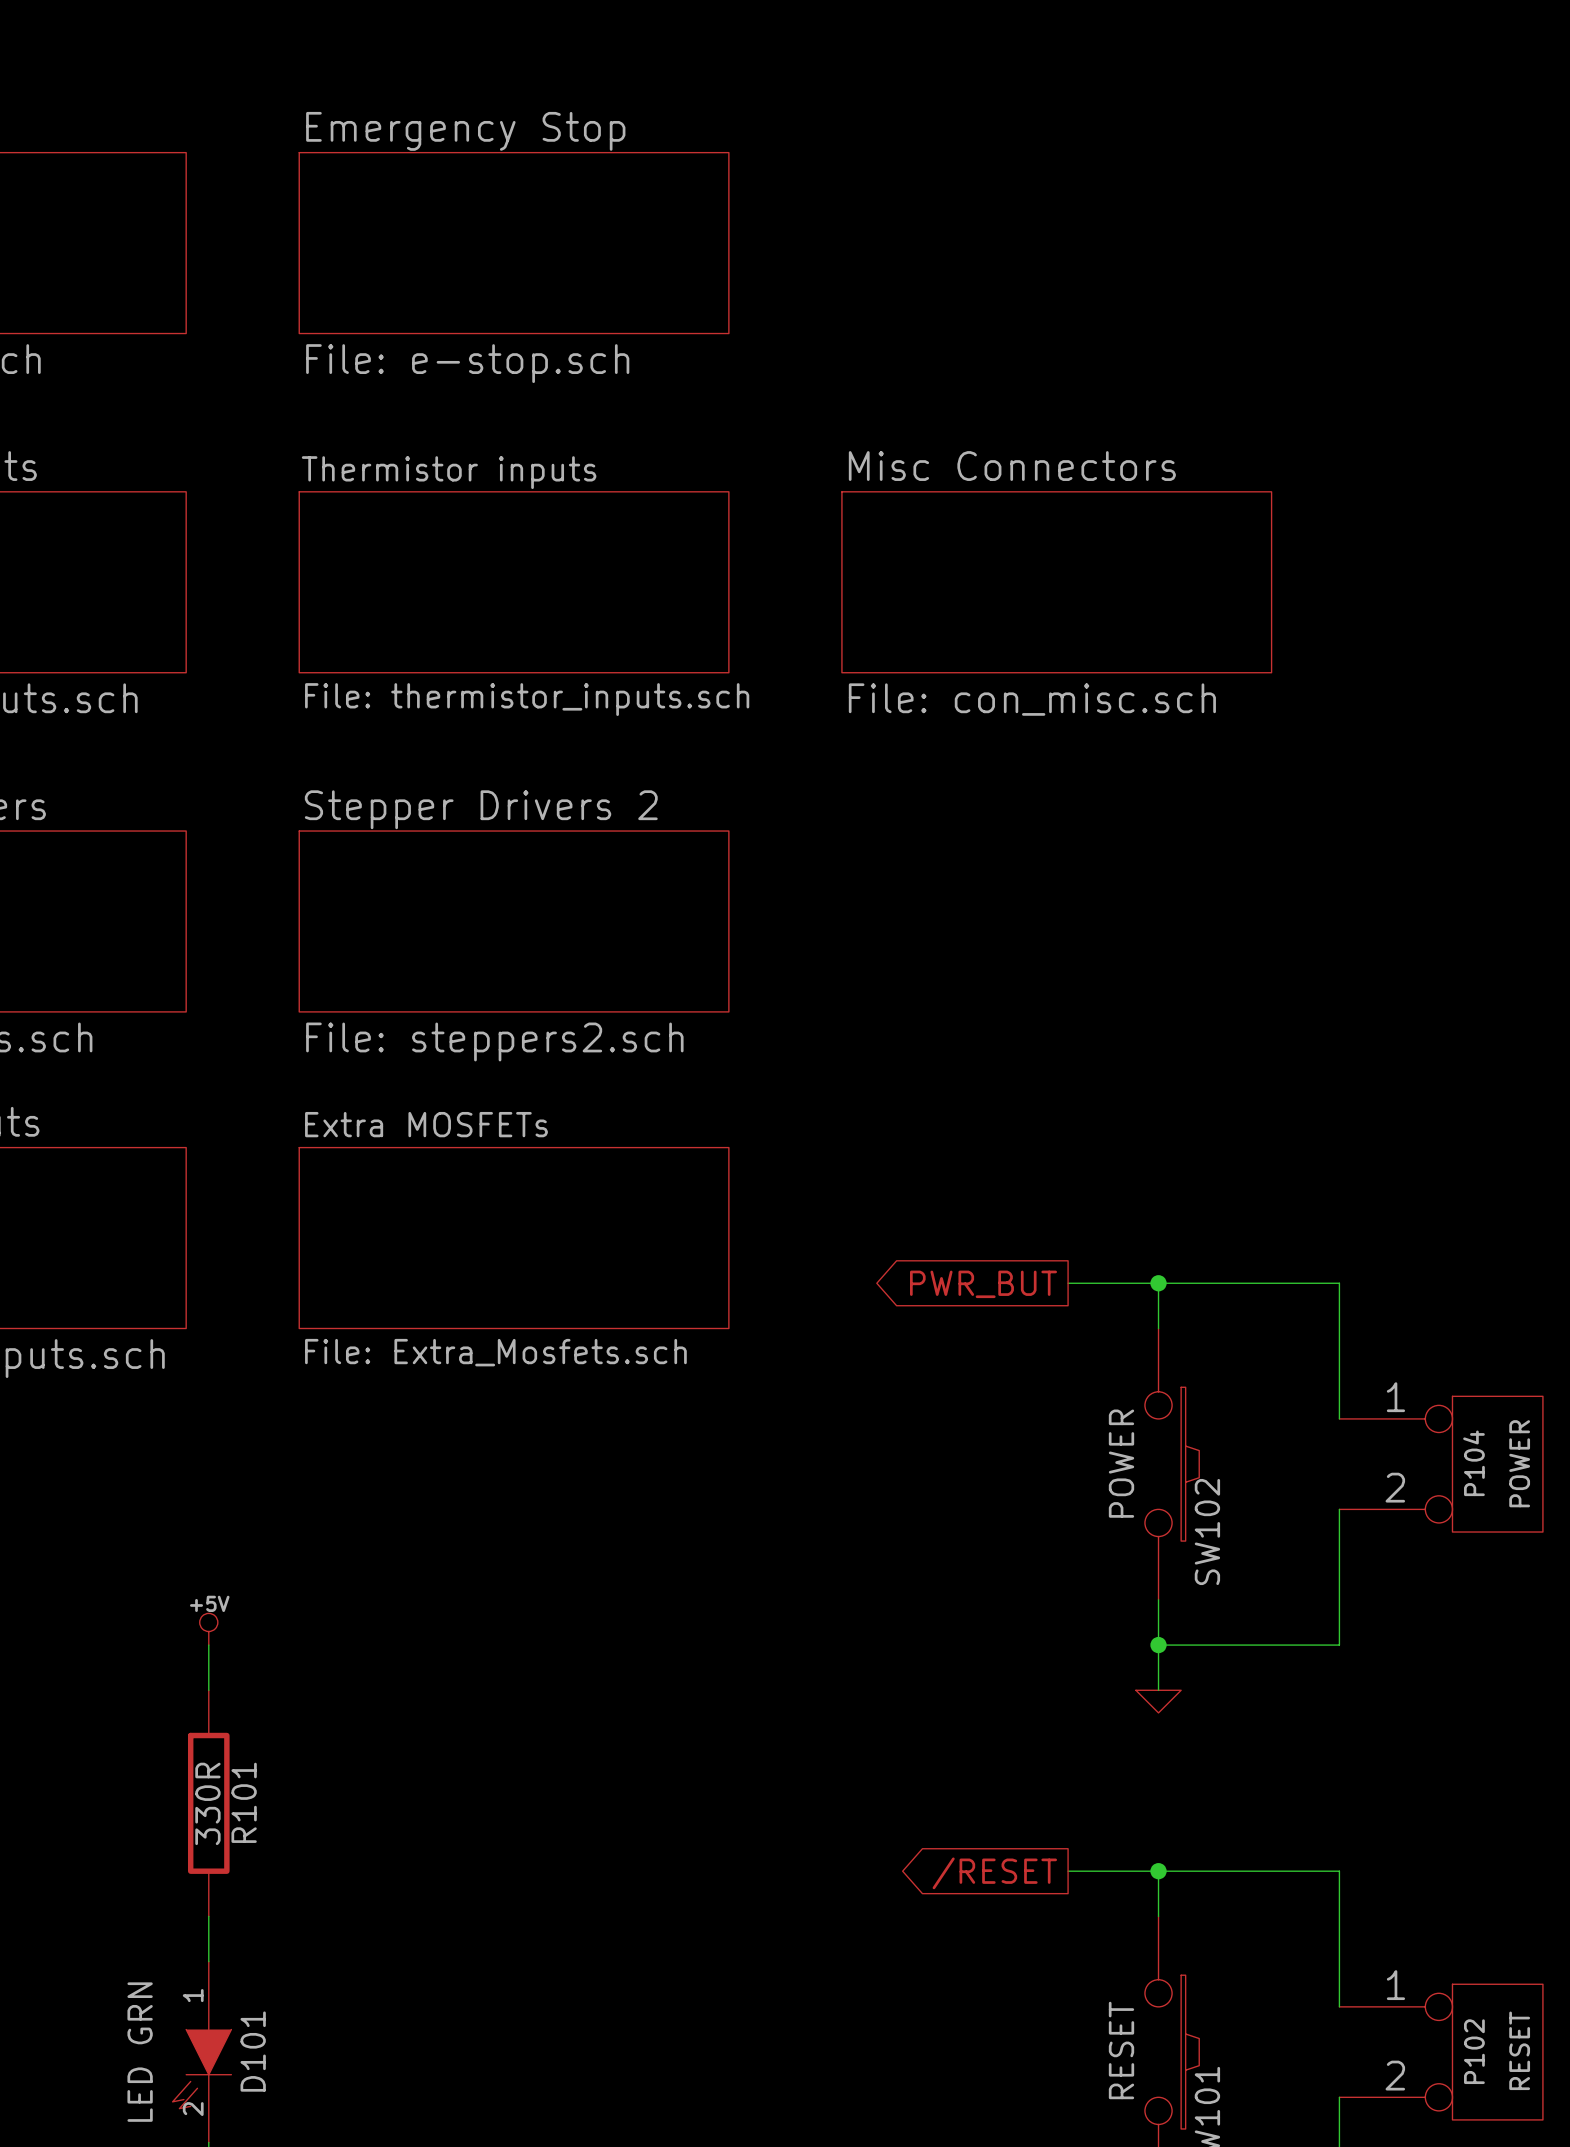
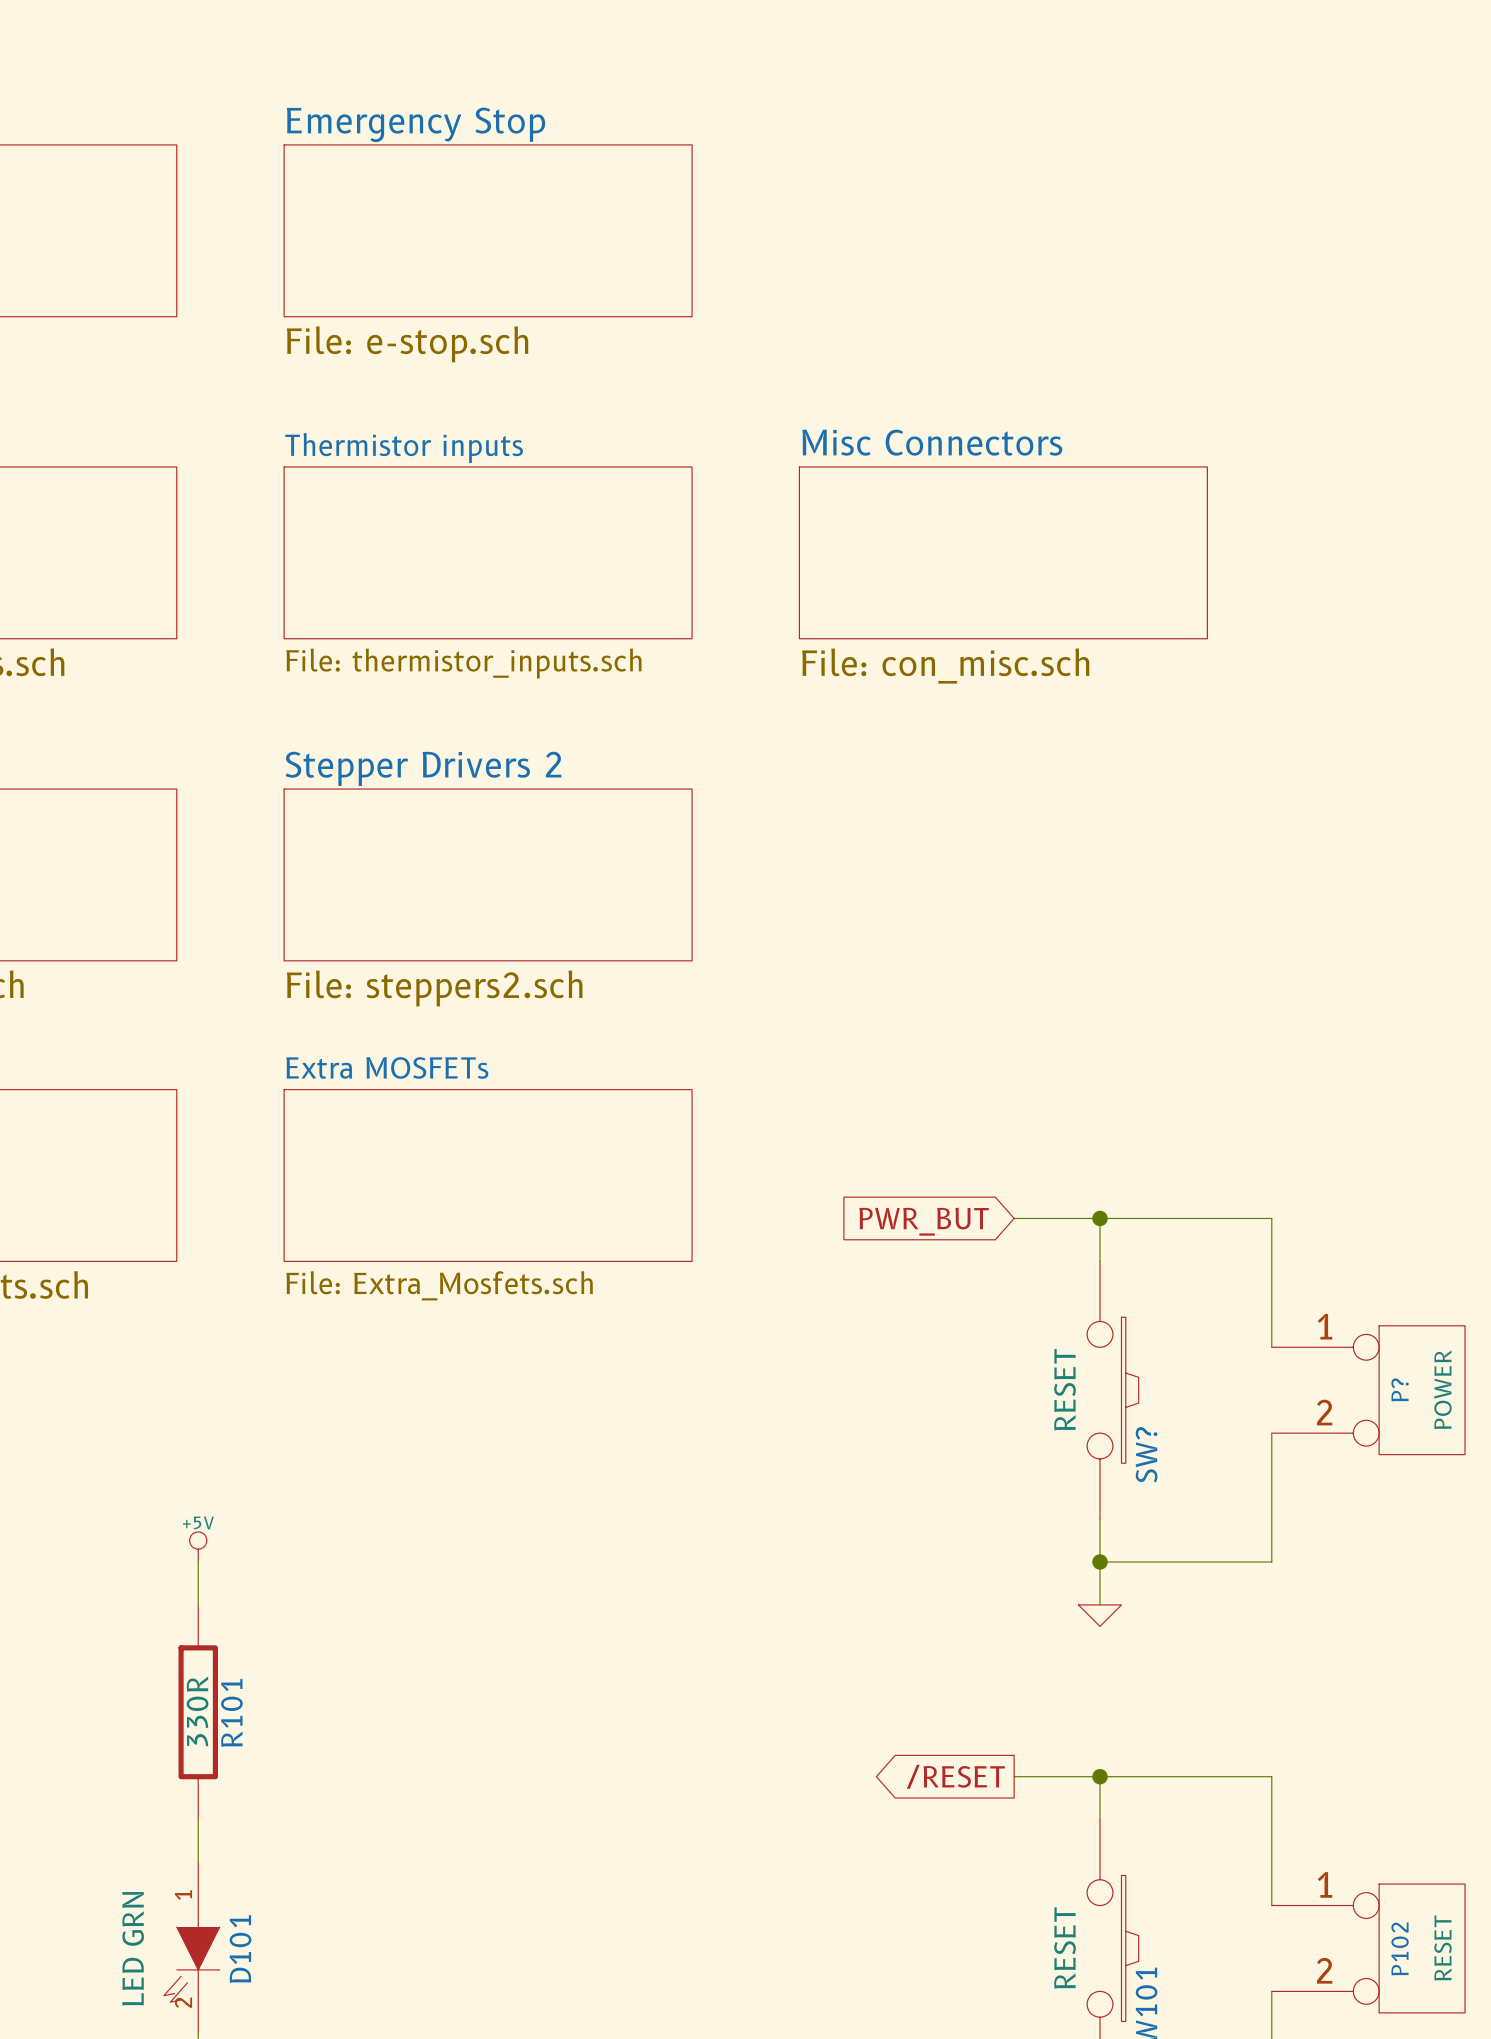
global label shape: output (983, 1284) -> input (924, 1221)
SW102 value: POWER (1121, 1463) -> RESET (1065, 1389)
P104 name: P104 (1473, 1463) -> P? (1400, 1389)
SW102 name: SW102 (1207, 1532) -> SW? (1146, 1454)

